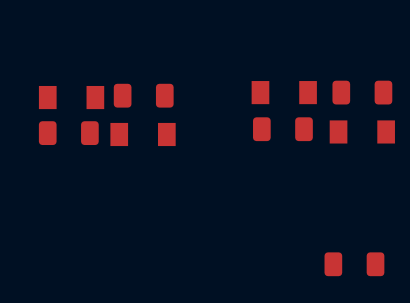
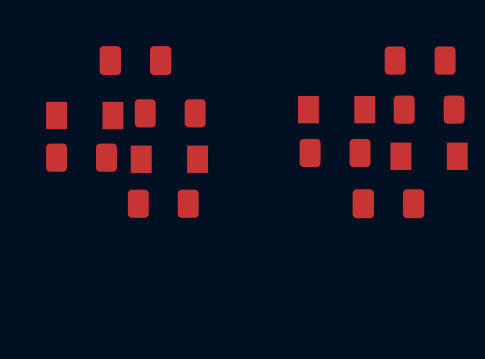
part: none -> (135, 60)
part: none -> (420, 60)
part: none -> (163, 203)
part: none -> (388, 203)
part: (354, 264) -> none

